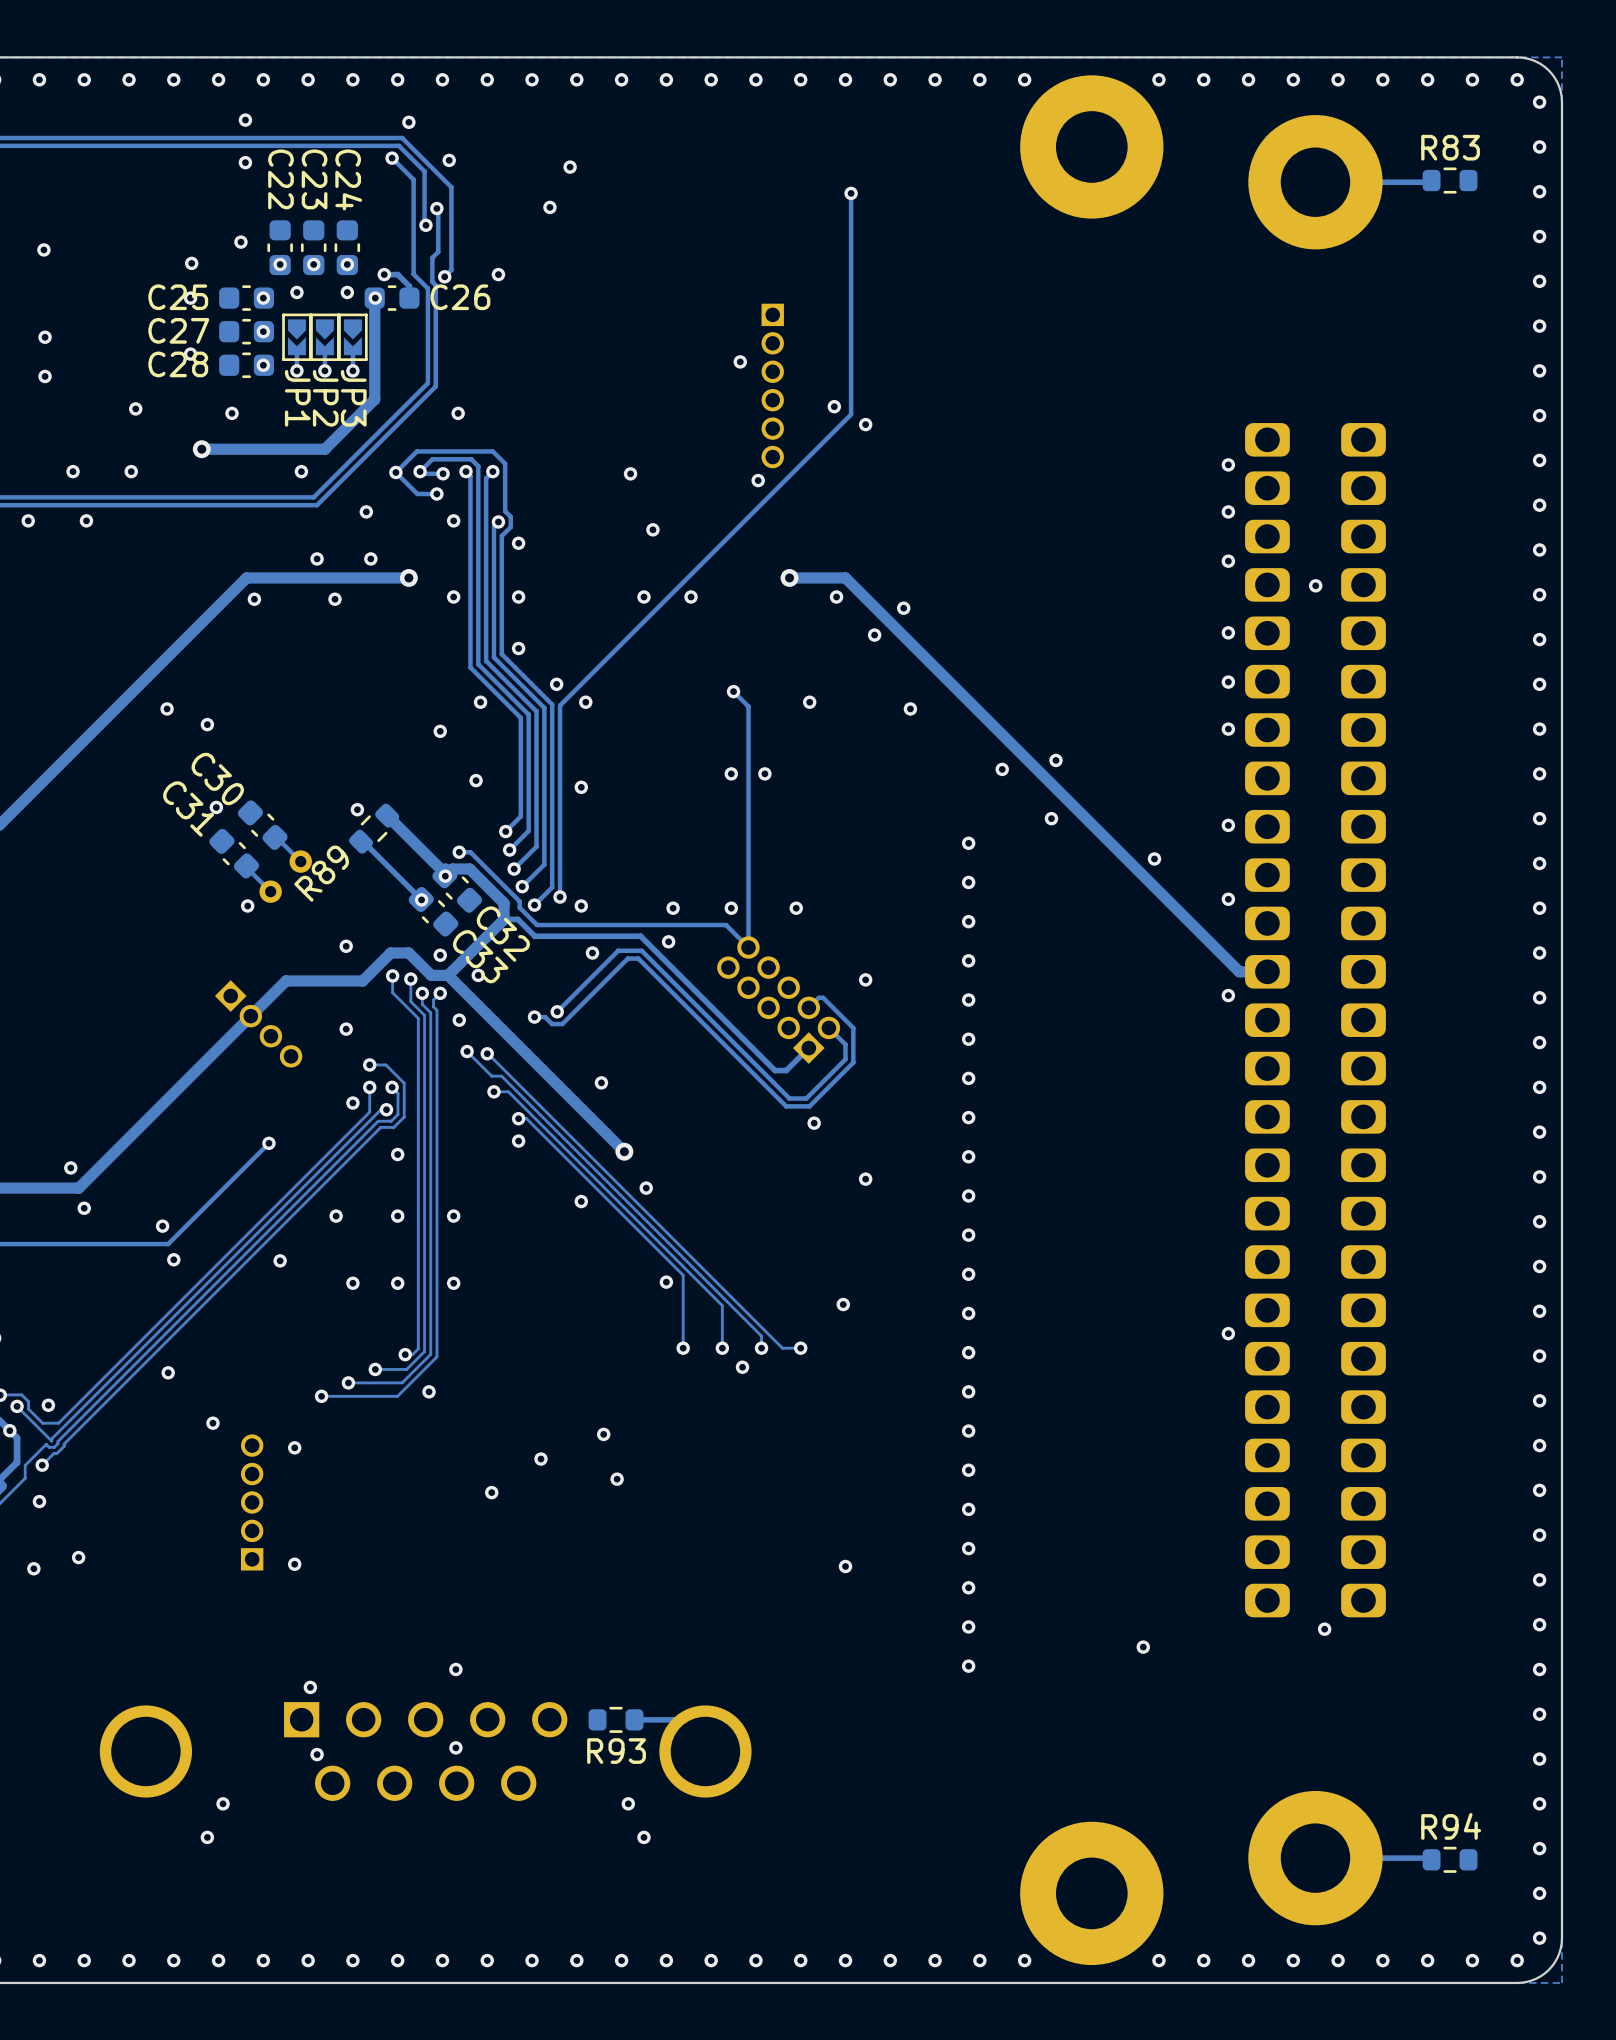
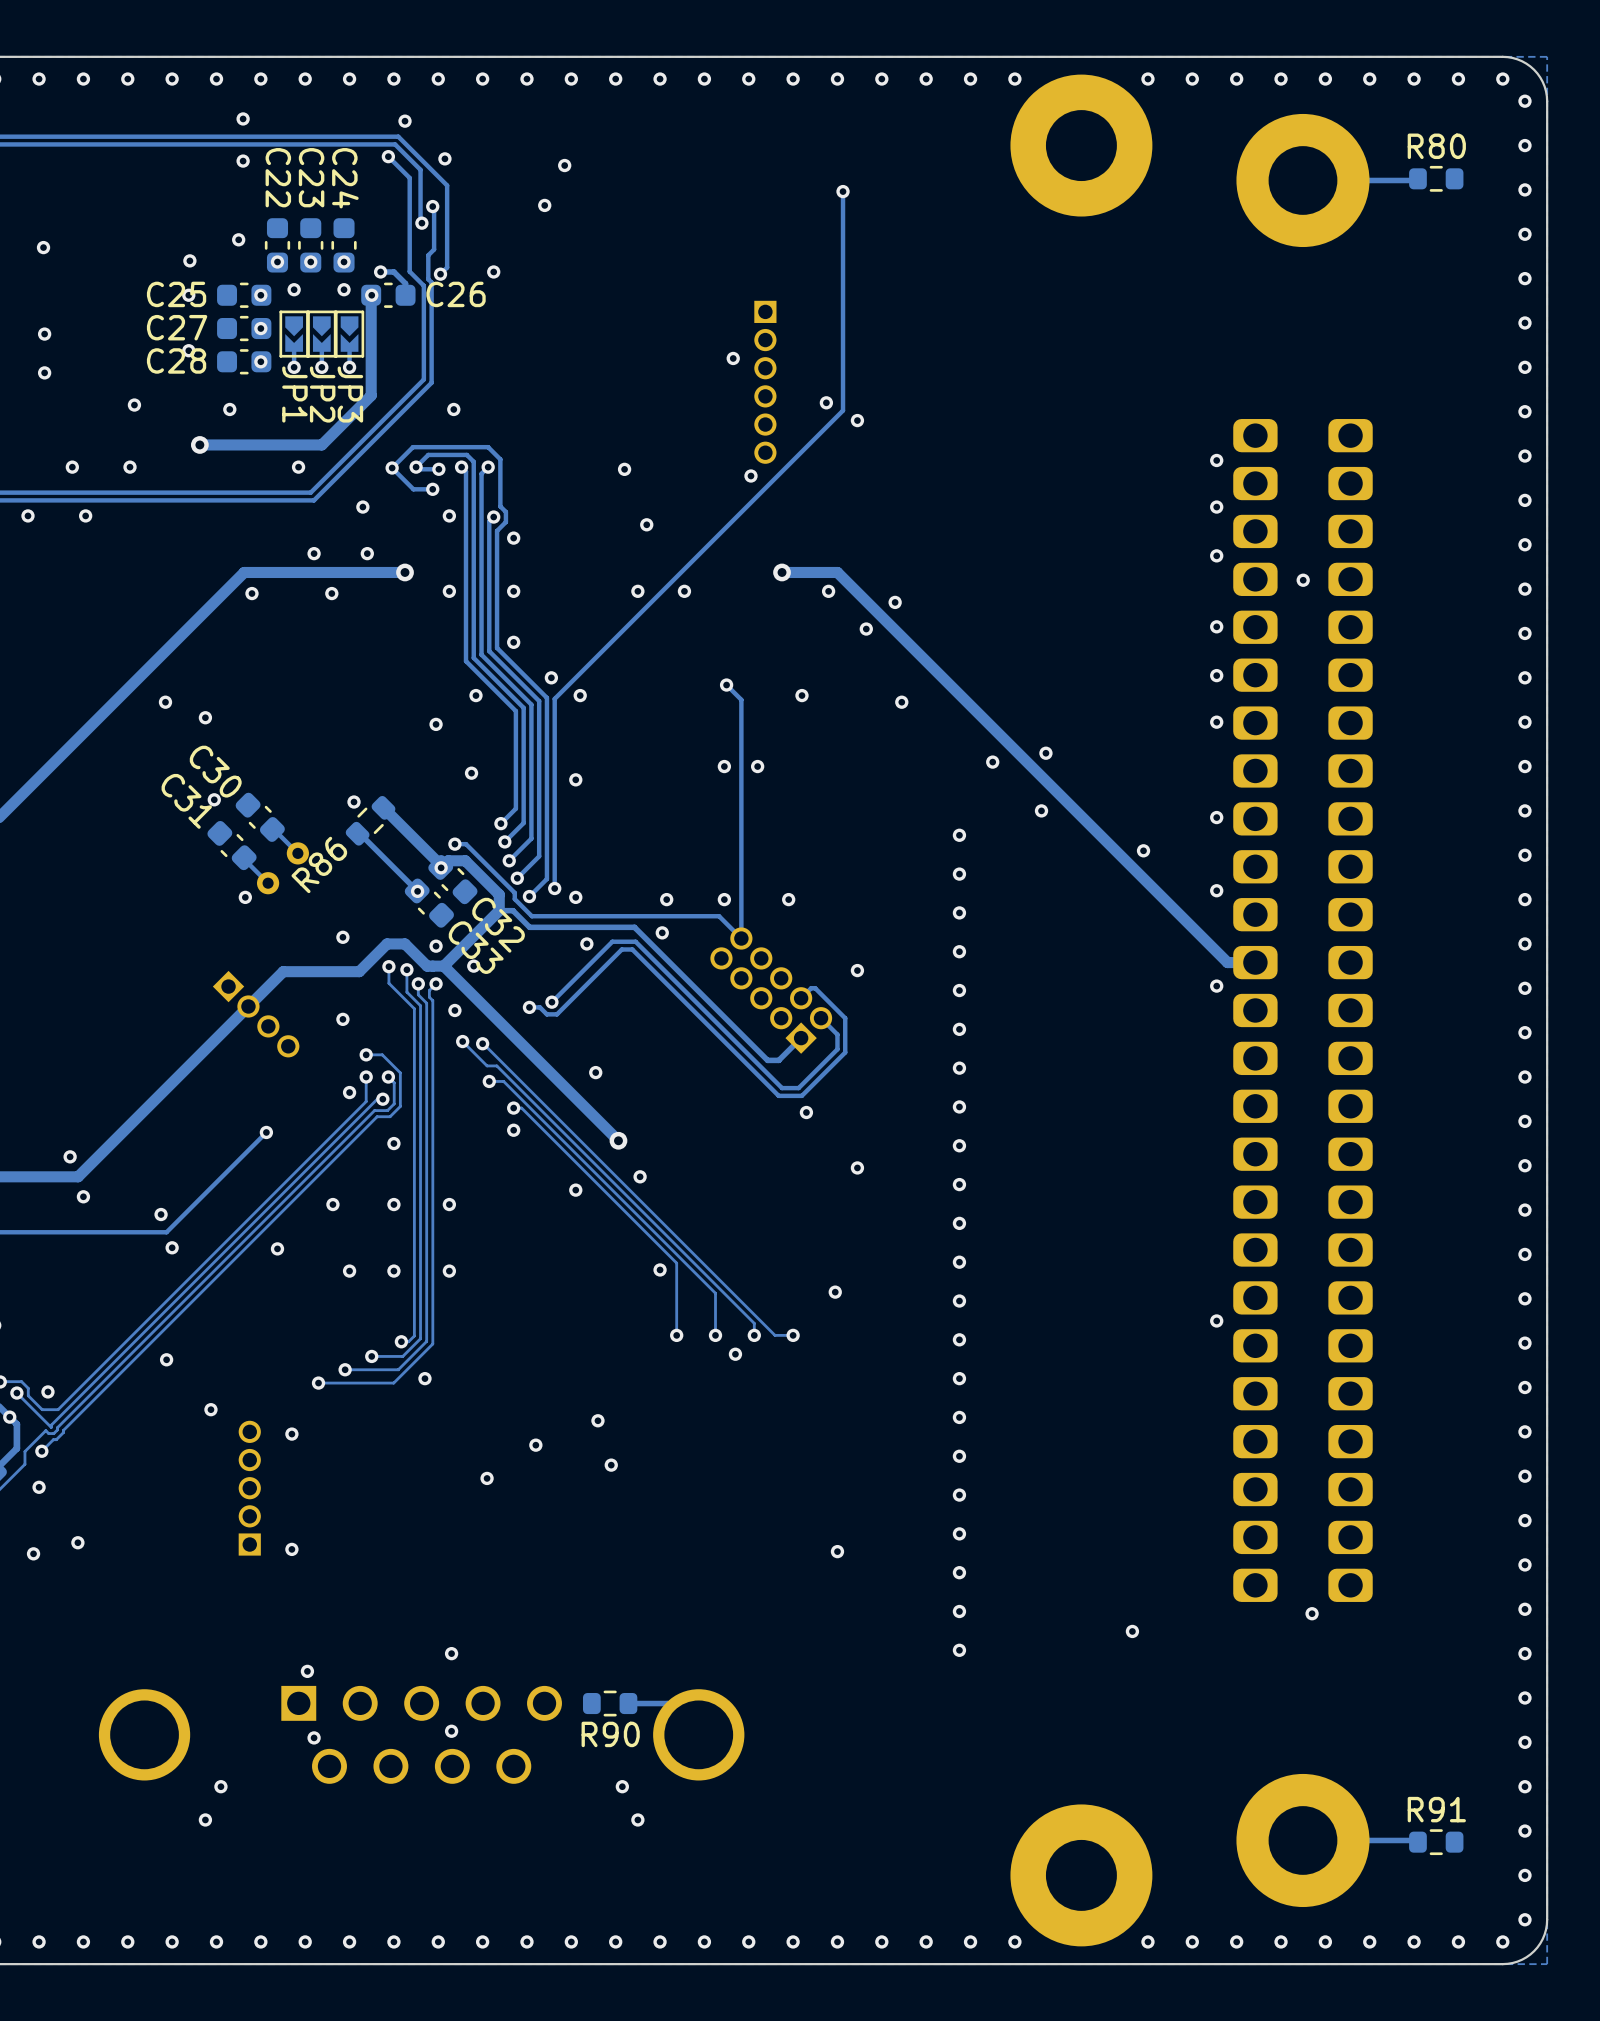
R83 name: R83 (1450, 147) -> R80 (1436, 146)
R89 name: R89 (321, 873) -> R86 (319, 864)
R93 name: R93 (616, 1751) -> R90 (610, 1734)
R94 name: R94 (1451, 1826) -> R91 (1436, 1809)

